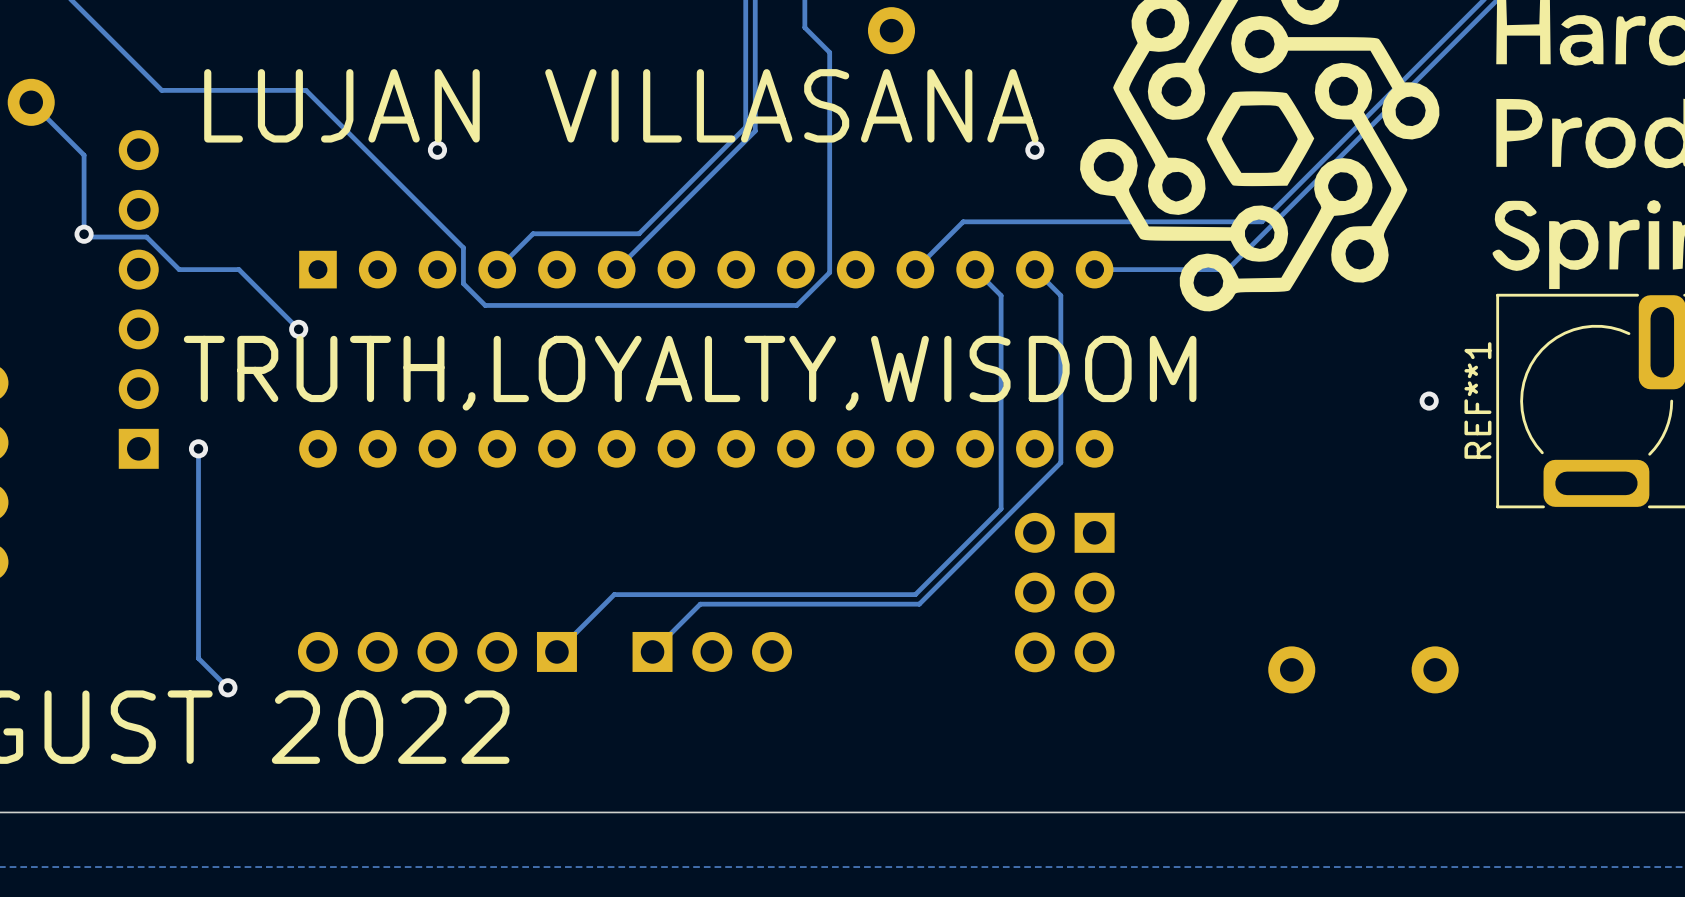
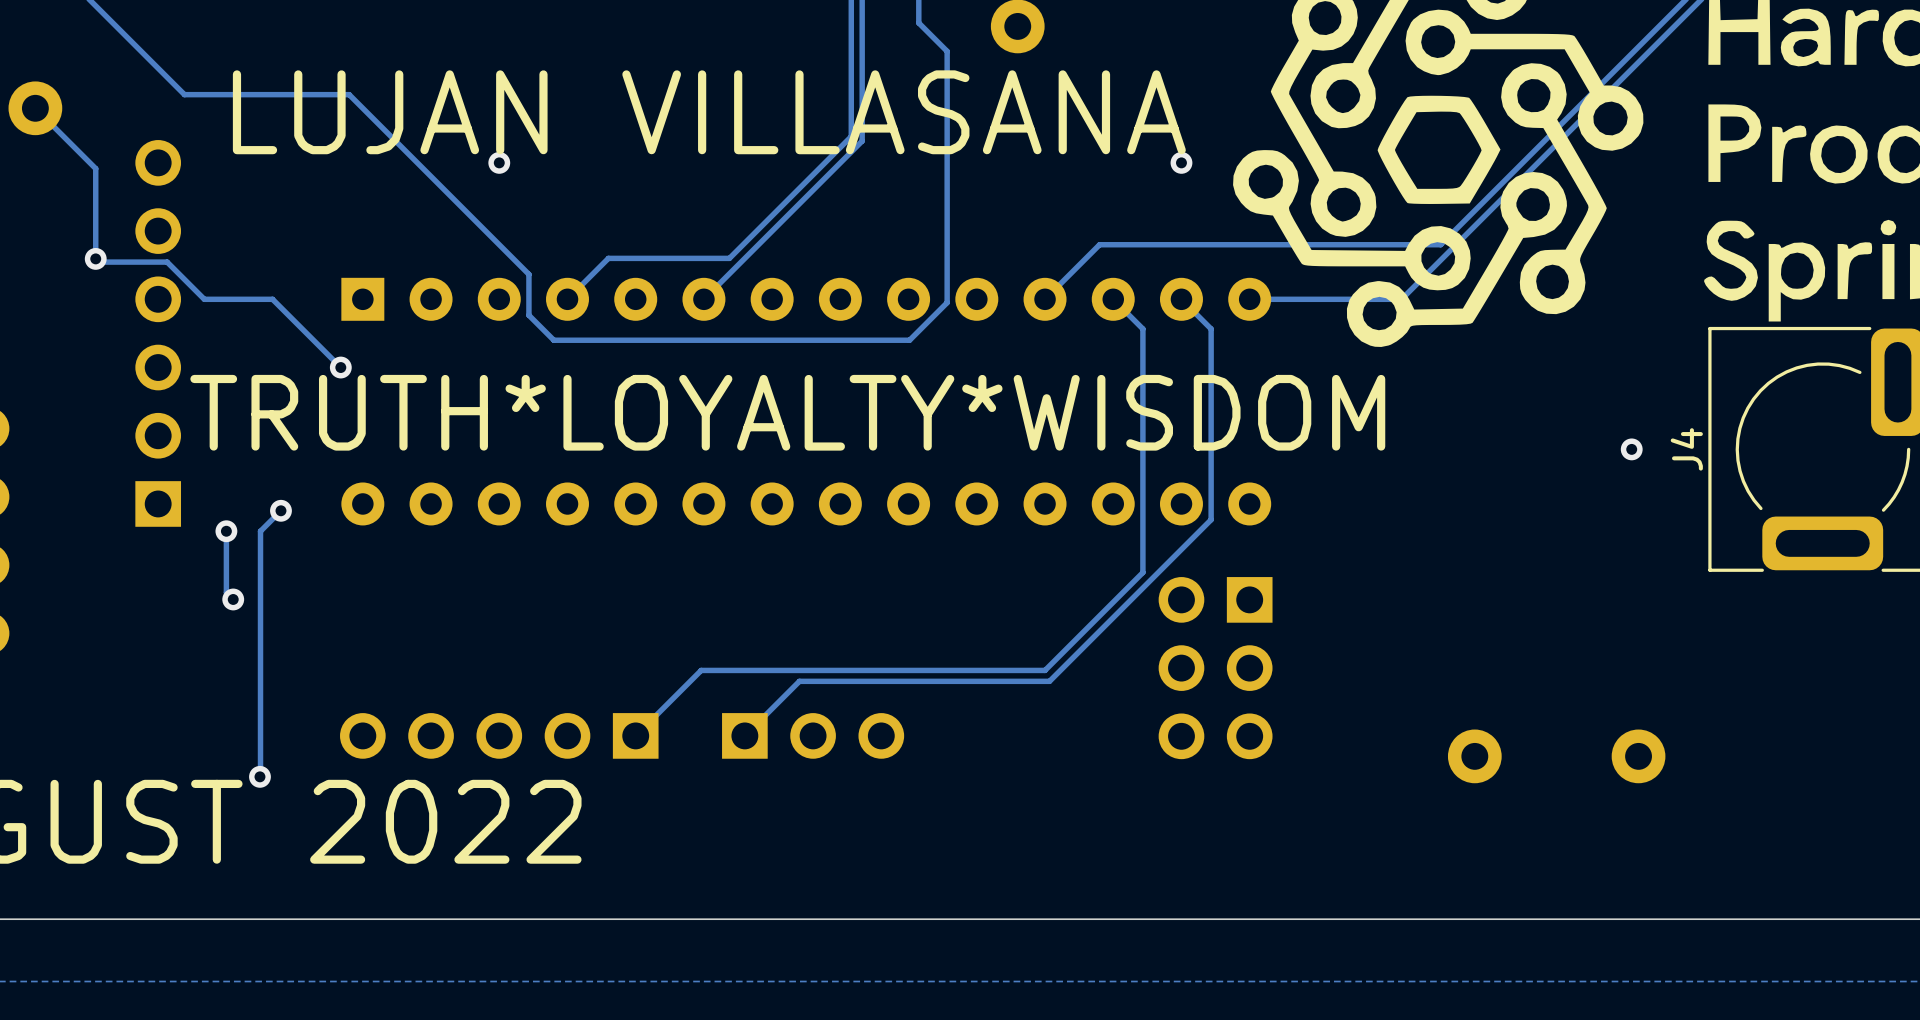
text: TRUTH,LOYALTY,WISDOM (690, 373) -> TRUTH*LOYALTY*WISDOM (787, 412)
REF**1 name: REF**1 (1477, 400) -> J4 (1686, 449)
track: (198, 448) (198, 472) -> none
via: (198, 448) -> none
via: none -> (280, 510)
via: none -> (226, 531)
track: (198, 526) (198, 658) (227, 687) -> (280, 510) (260, 531) (259, 776)
via: none -> (233, 599)

